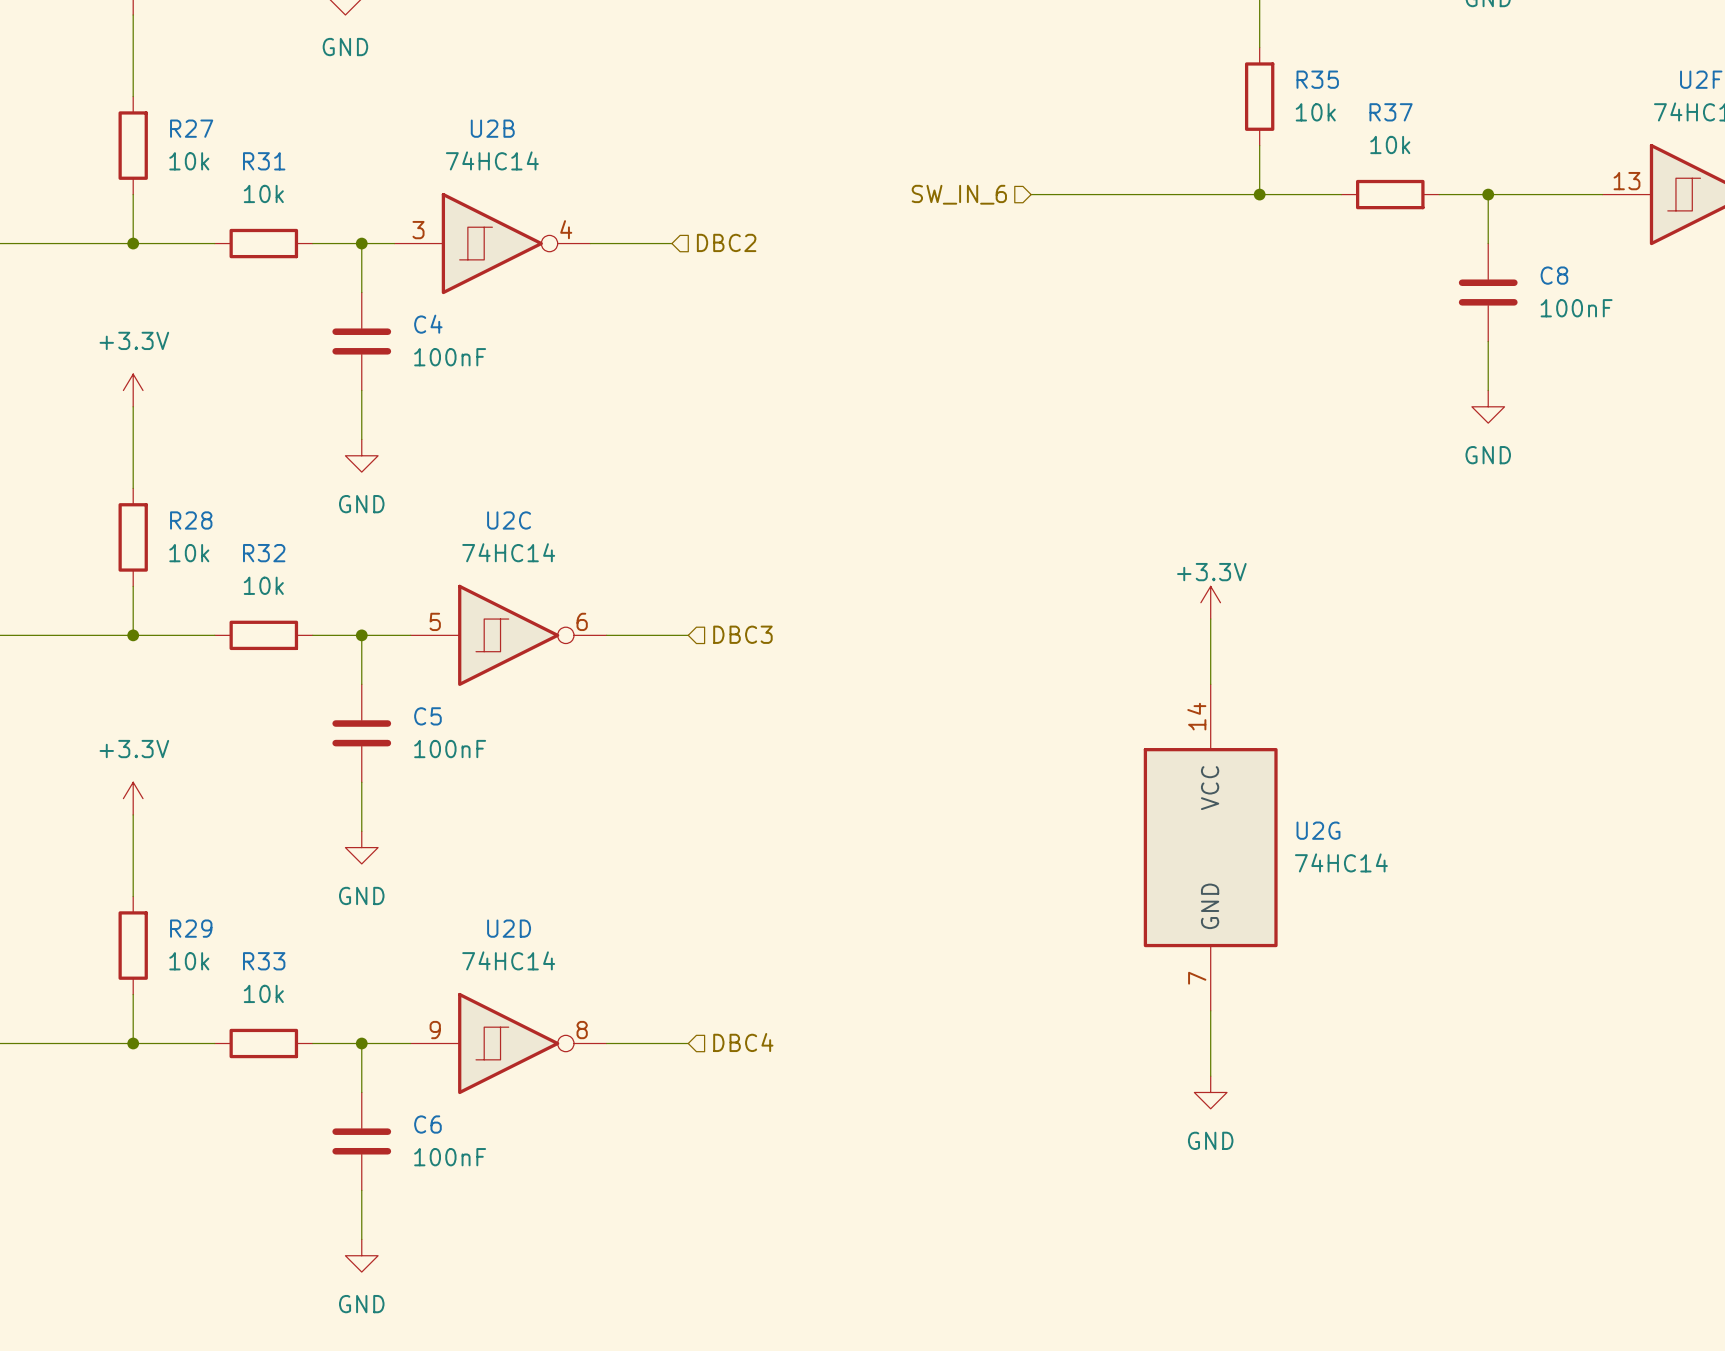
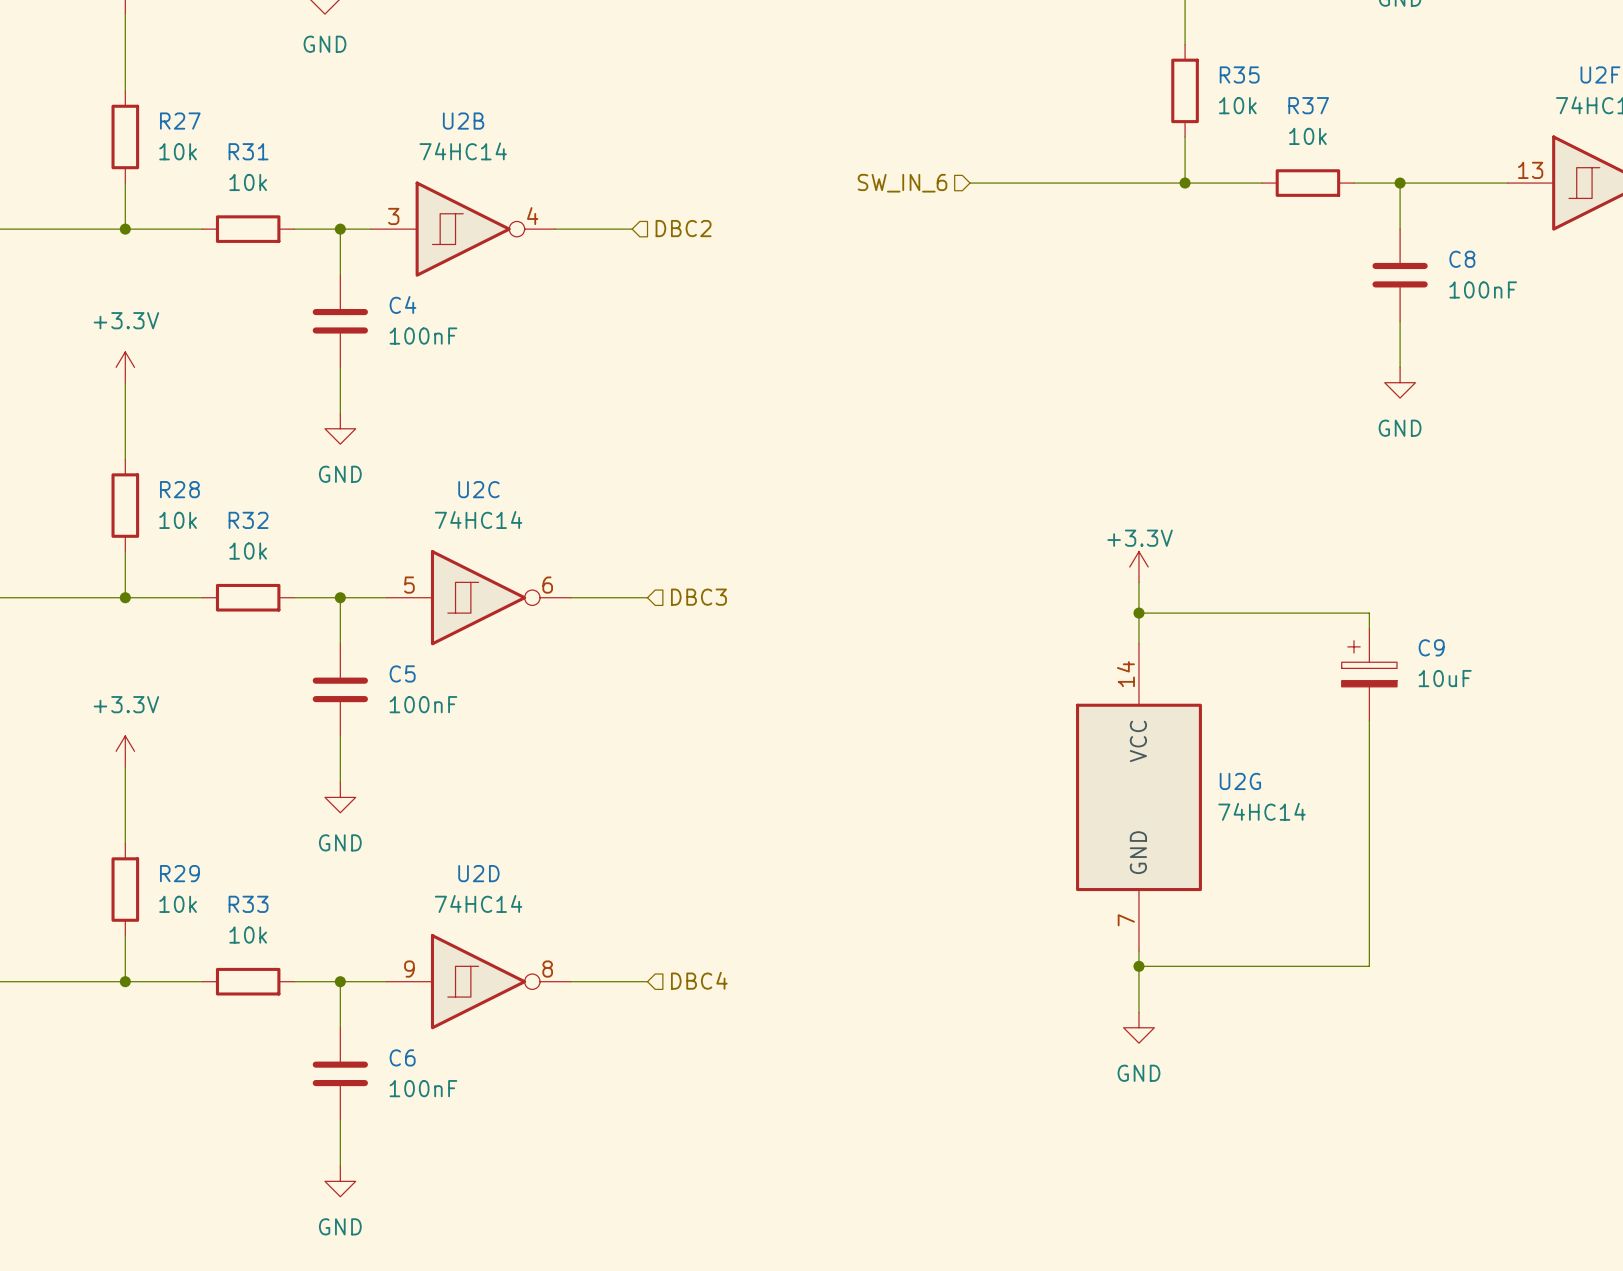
wire: none -> (1138, 613) (1369, 613) (1369, 628)
junction: none -> (1138, 613)
C9: none -> 10uF (1369, 674)
wire: none -> (1369, 720) (1369, 966) (1138, 966)
junction: none -> (1138, 966)

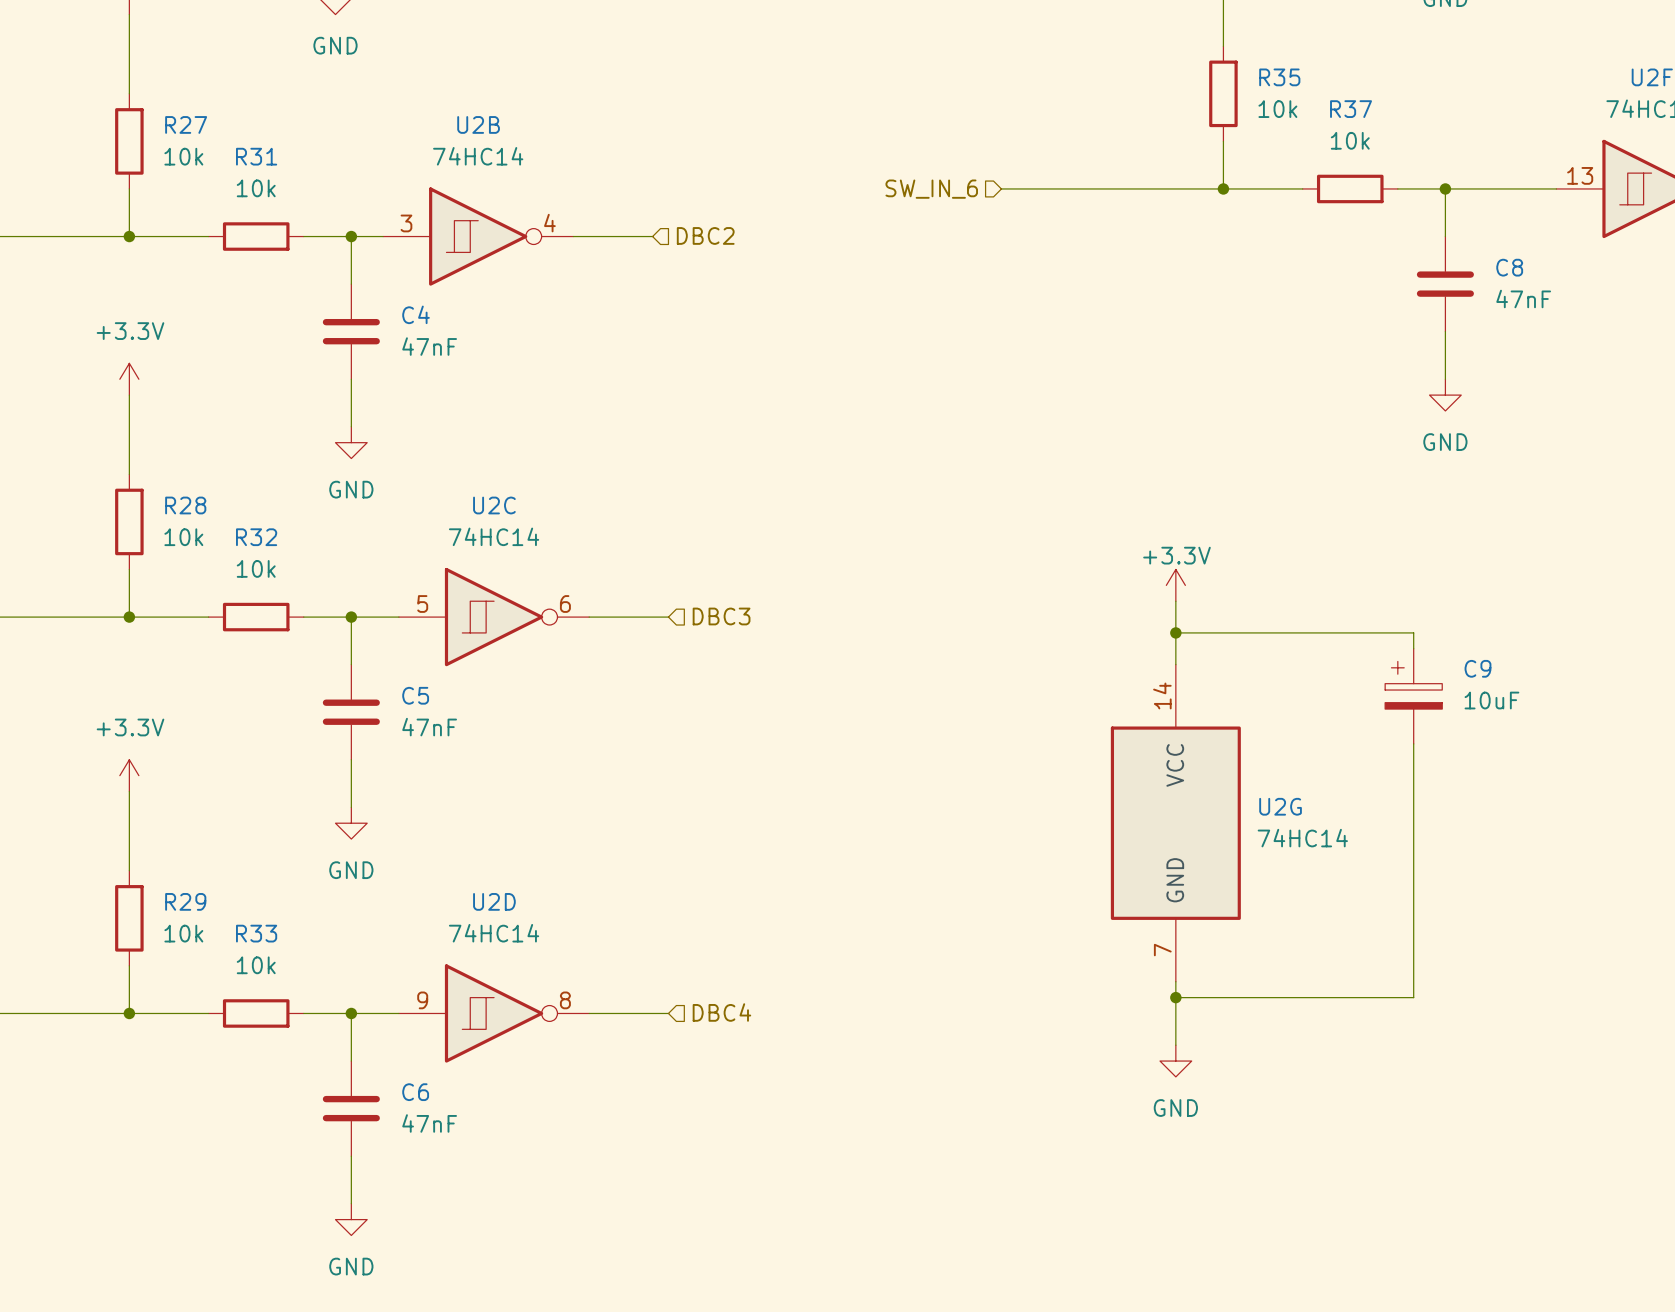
C8 value: 100nF (1483, 289) -> 47nF (1523, 298)
C4 value: 100nF (423, 336) -> 47nF (429, 346)
C5 value: 100nF (423, 704) -> 47nF (429, 727)
C6 value: 100nF (423, 1088) -> 47nF (429, 1123)

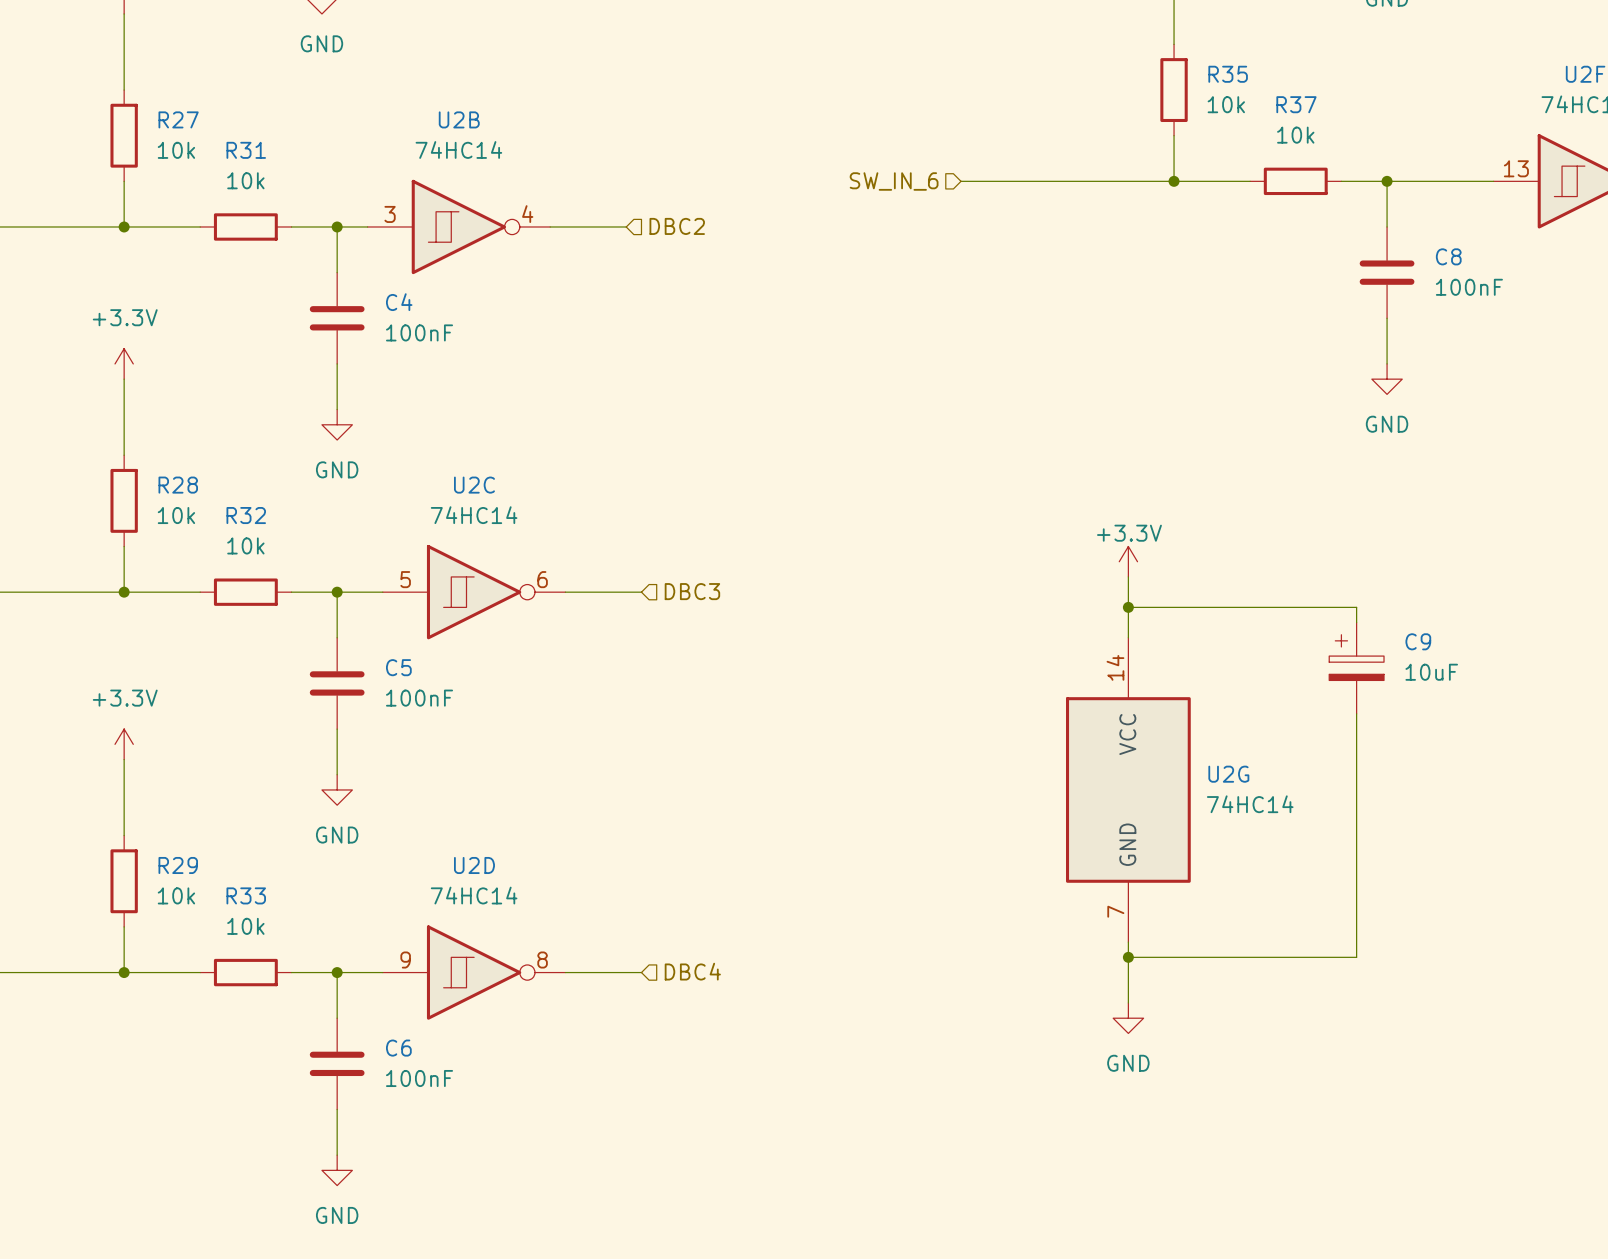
C8 value: 47nF (1523, 298) -> 100nF (1469, 287)
C4 value: 47nF (429, 346) -> 100nF (419, 332)
C5 value: 47nF (429, 727) -> 100nF (419, 698)
C6 value: 47nF (429, 1123) -> 100nF (419, 1078)

